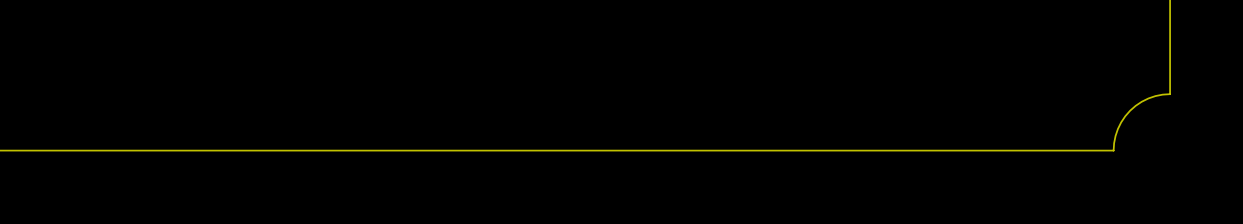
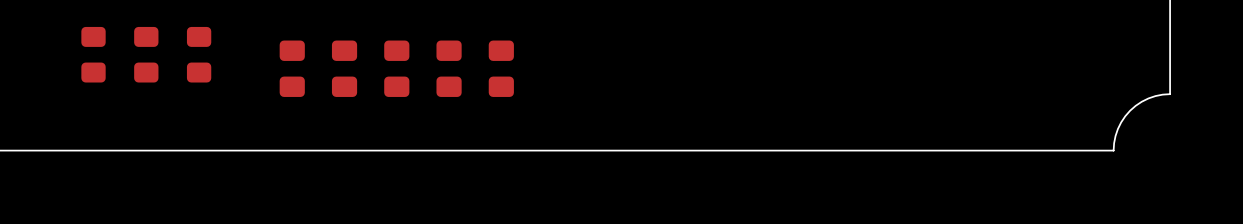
part: none -> (93, 54)
part: none -> (146, 54)
part: none -> (199, 54)
part: none -> (292, 68)
part: none -> (344, 68)
part: none -> (396, 68)
part: none -> (449, 68)
part: none -> (501, 68)

